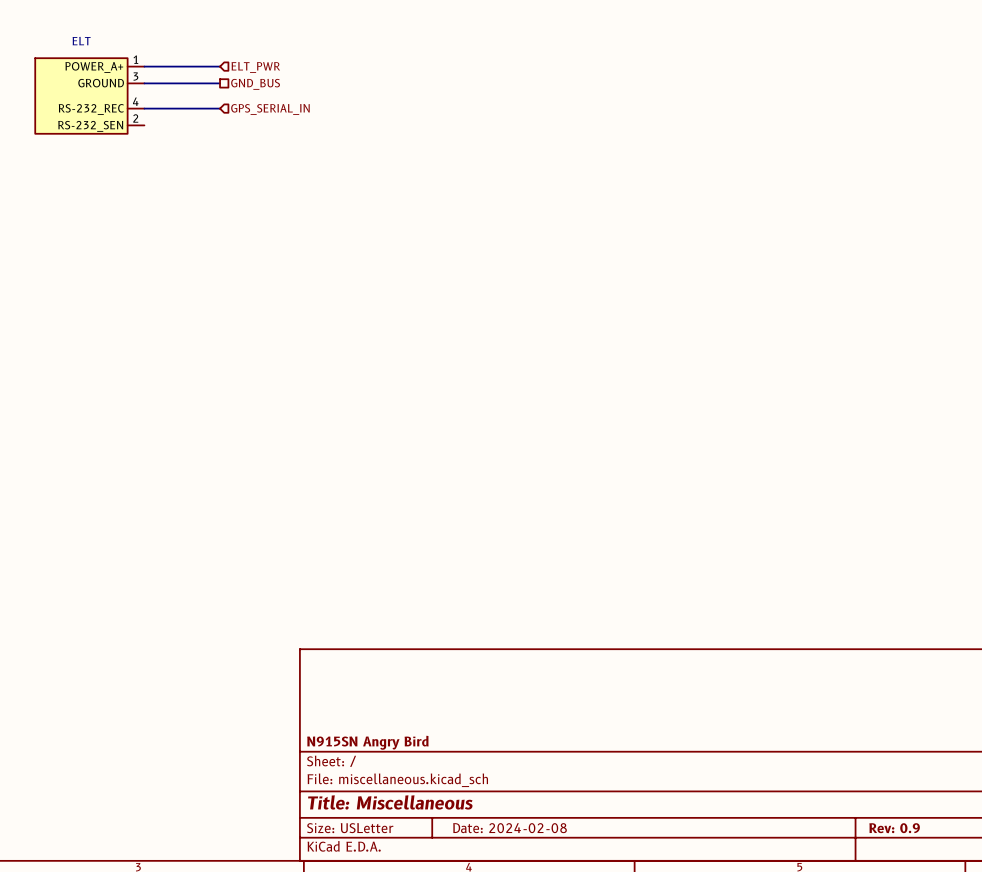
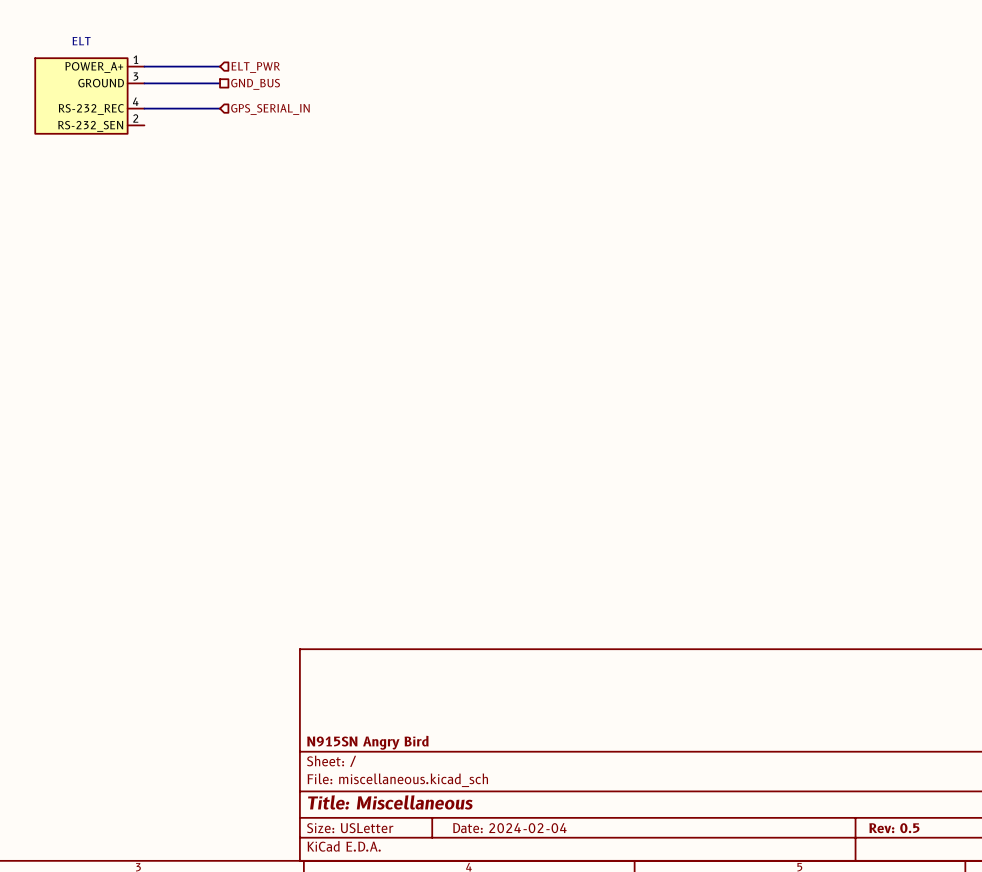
title block: Date: 2024-02-08 (510, 828) -> Date: 2024-02-04 (509, 828)
title block: Rev: 0.9 (894, 828) -> Rev: 0.5 (894, 828)

